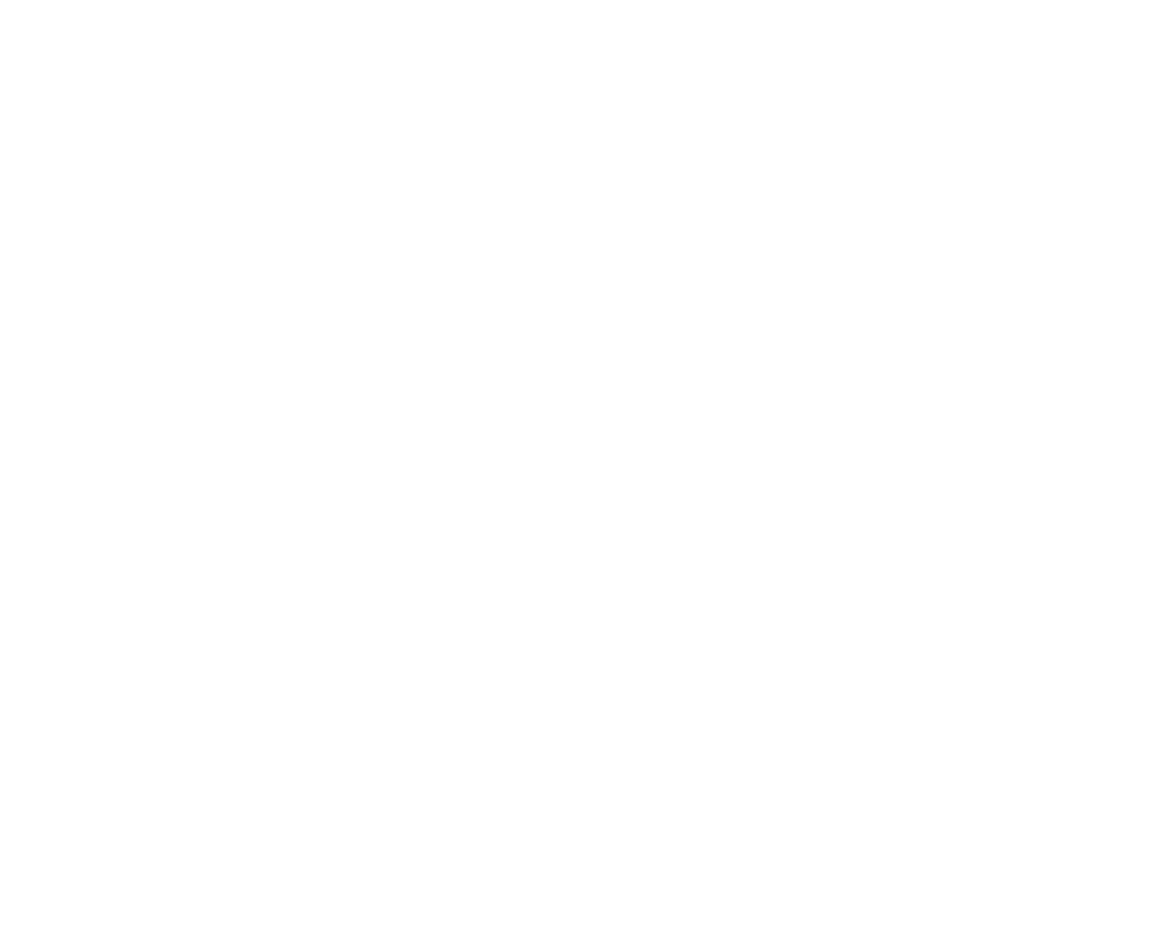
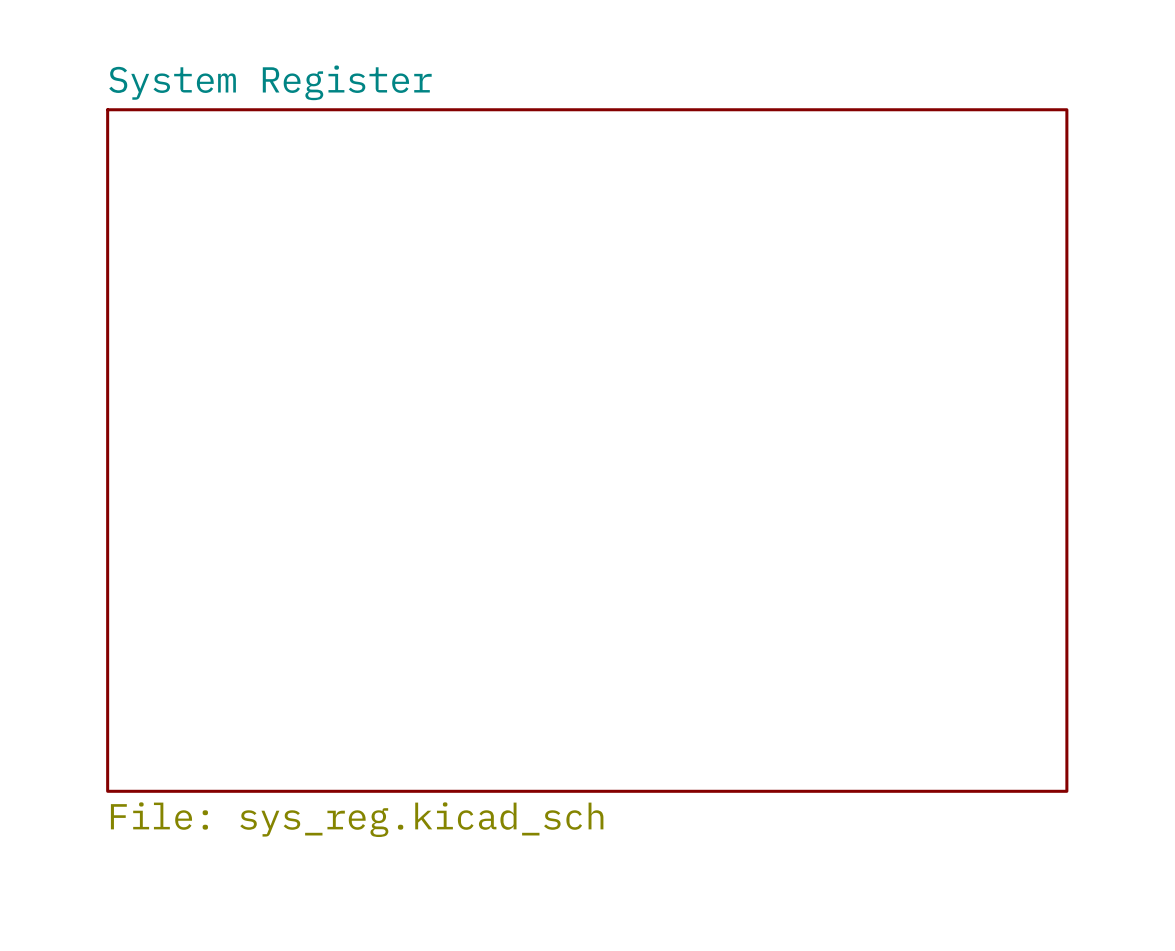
sheet System Register: none -> File: sys_reg.kicad_sch (587, 450)

